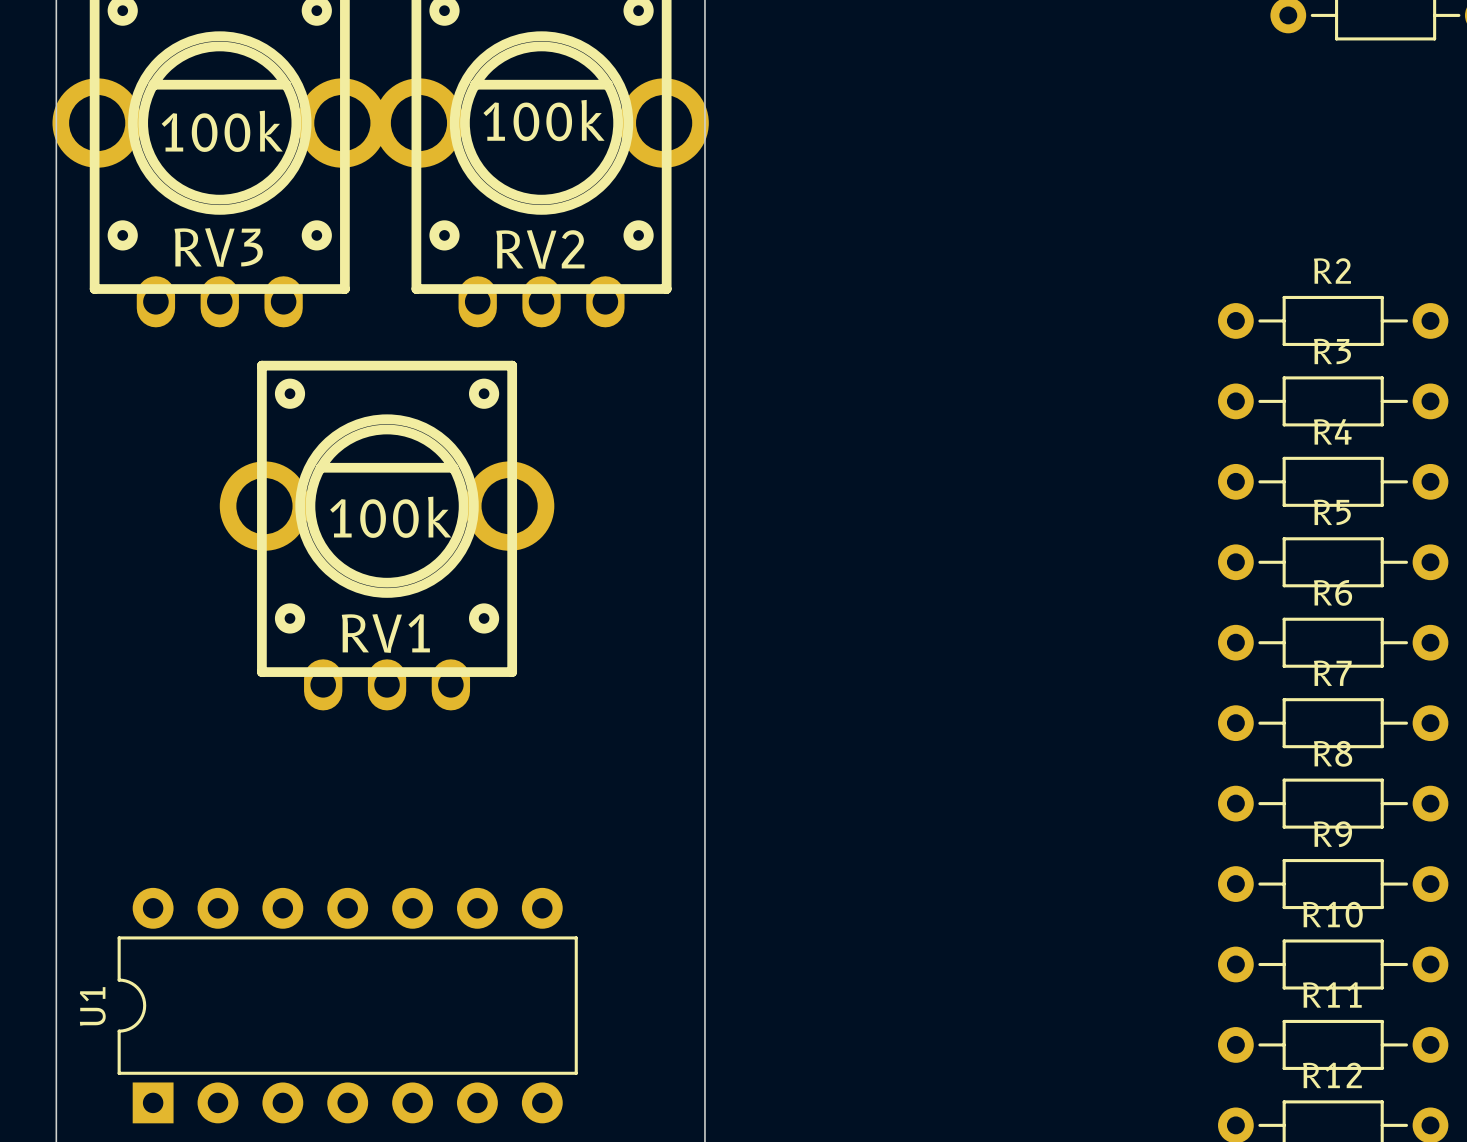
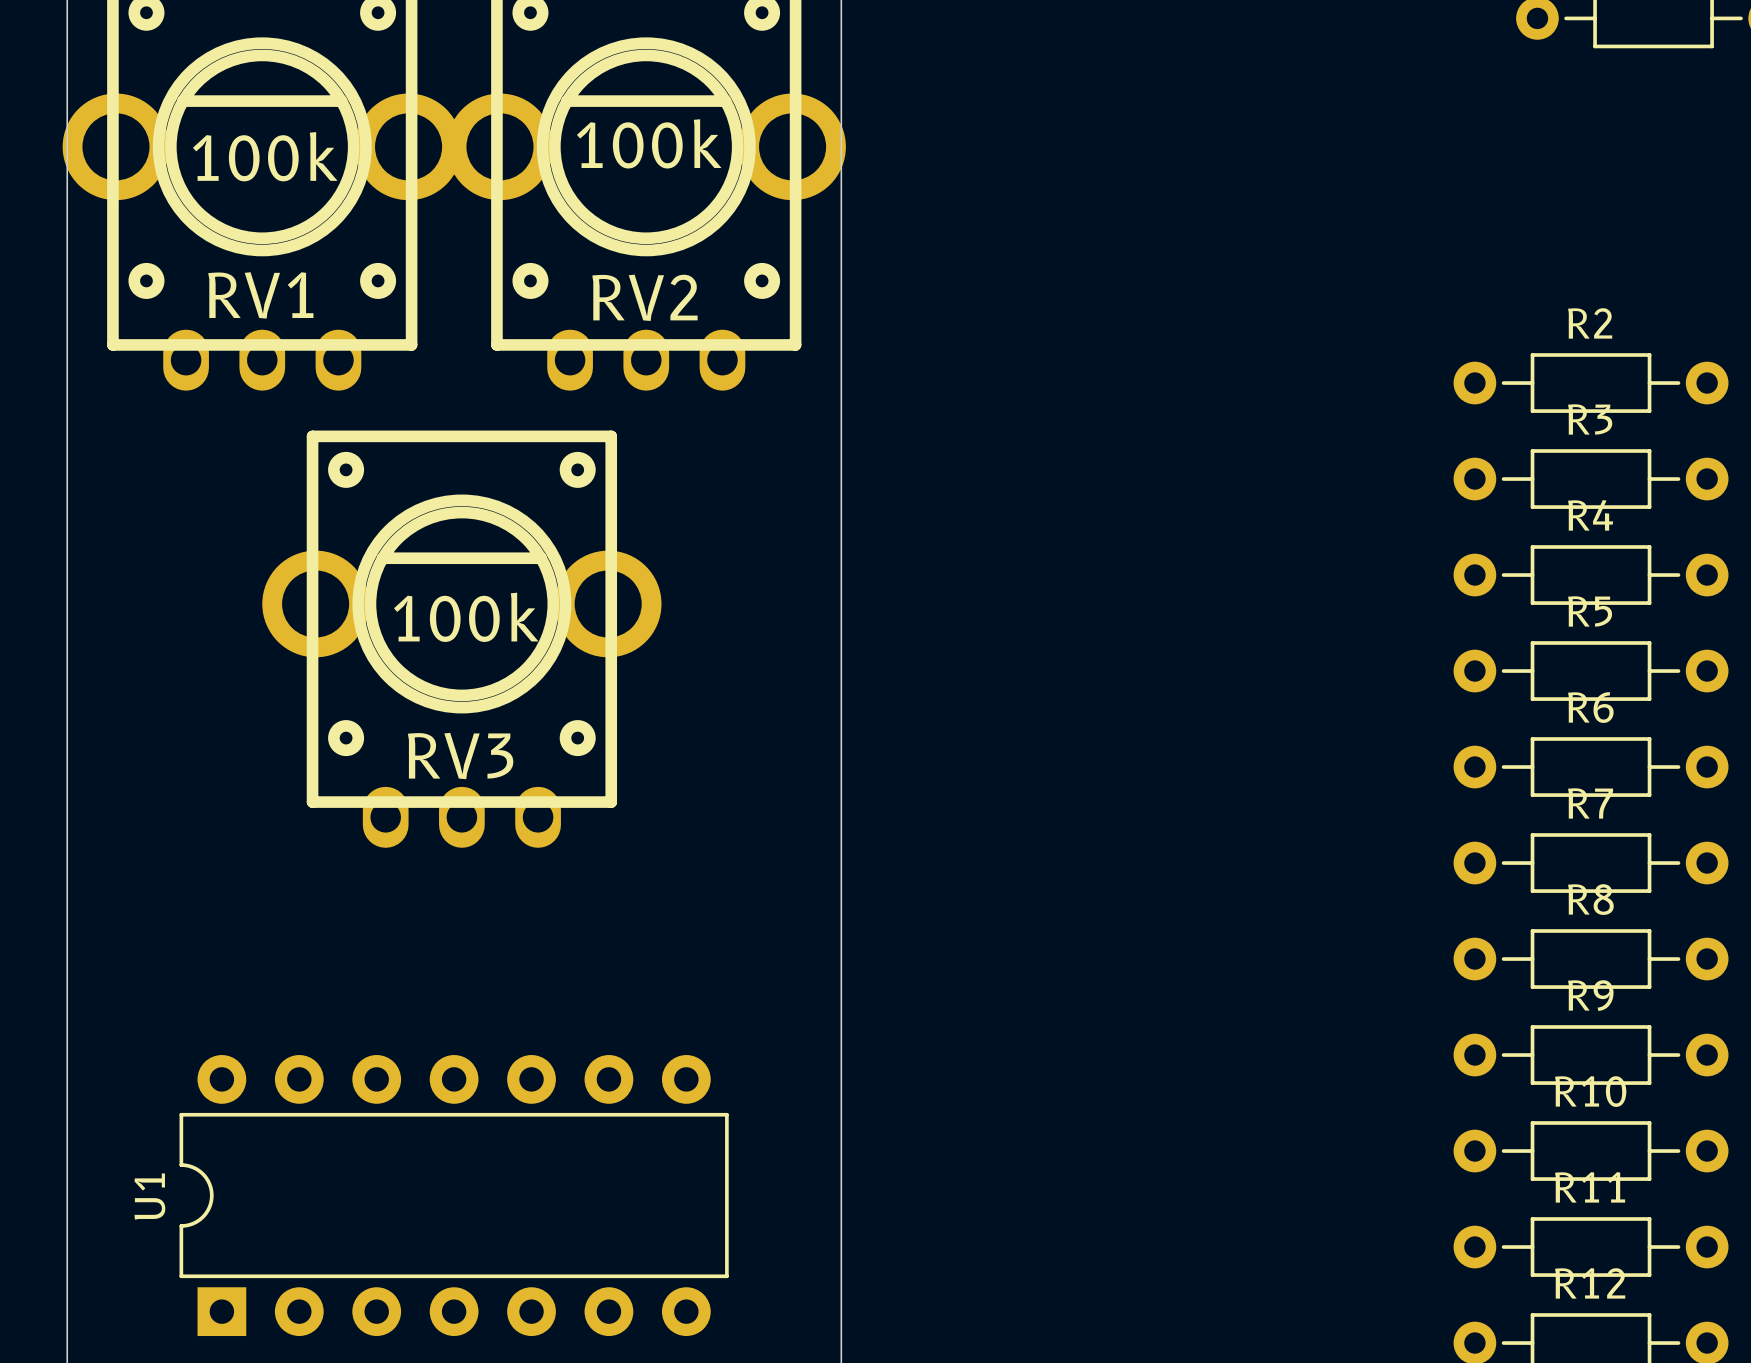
RV3 name: RV3 (218, 247) -> RV1 (260, 295)
RV1 name: RV1 (385, 633) -> RV3 (460, 756)
U1 position: (347, 1005) -> (454, 1195)

